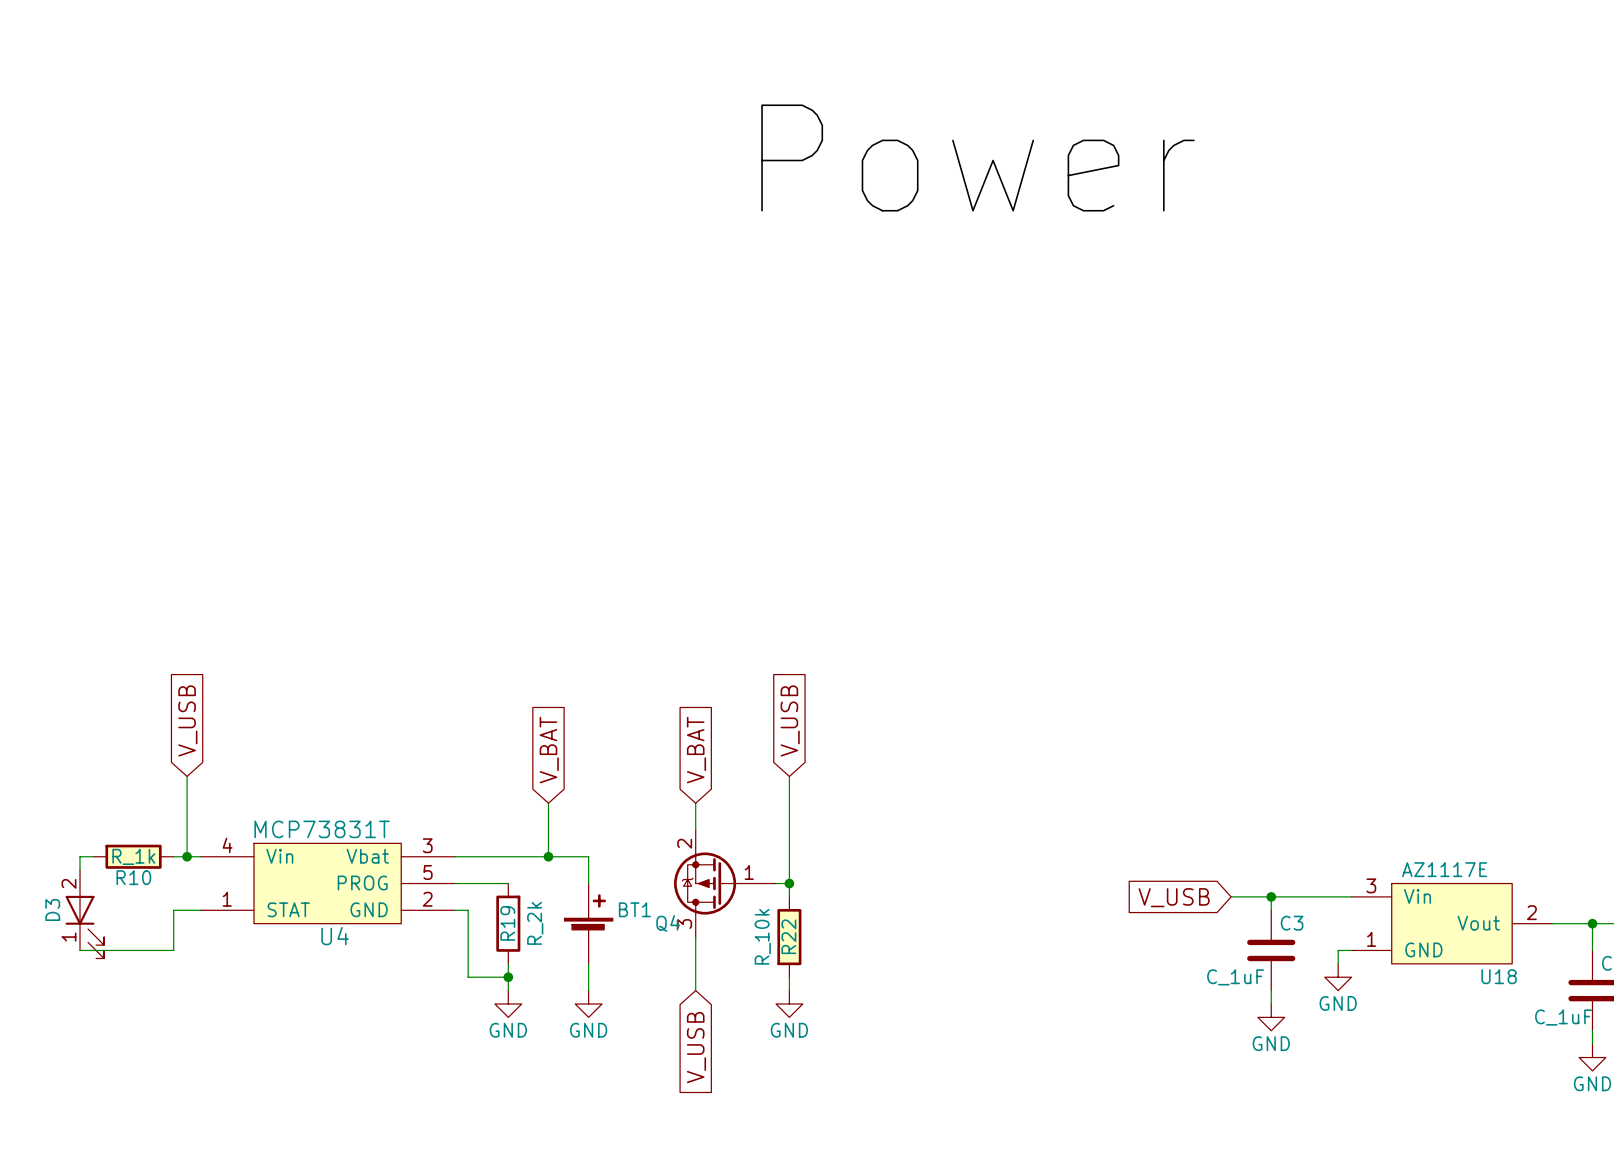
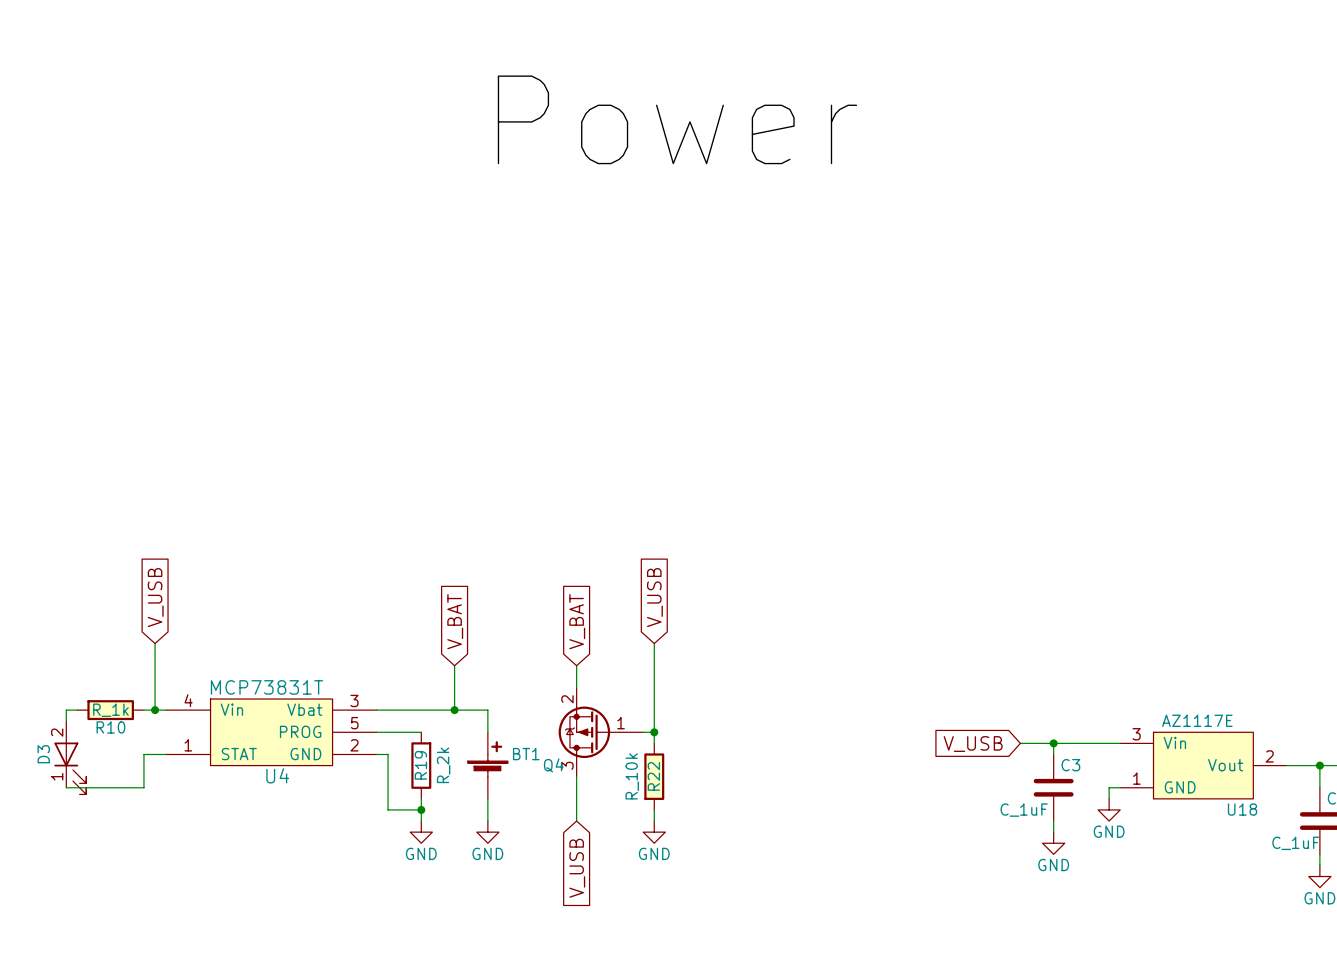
label position: Power (978, 157) -> Power (677, 119)

